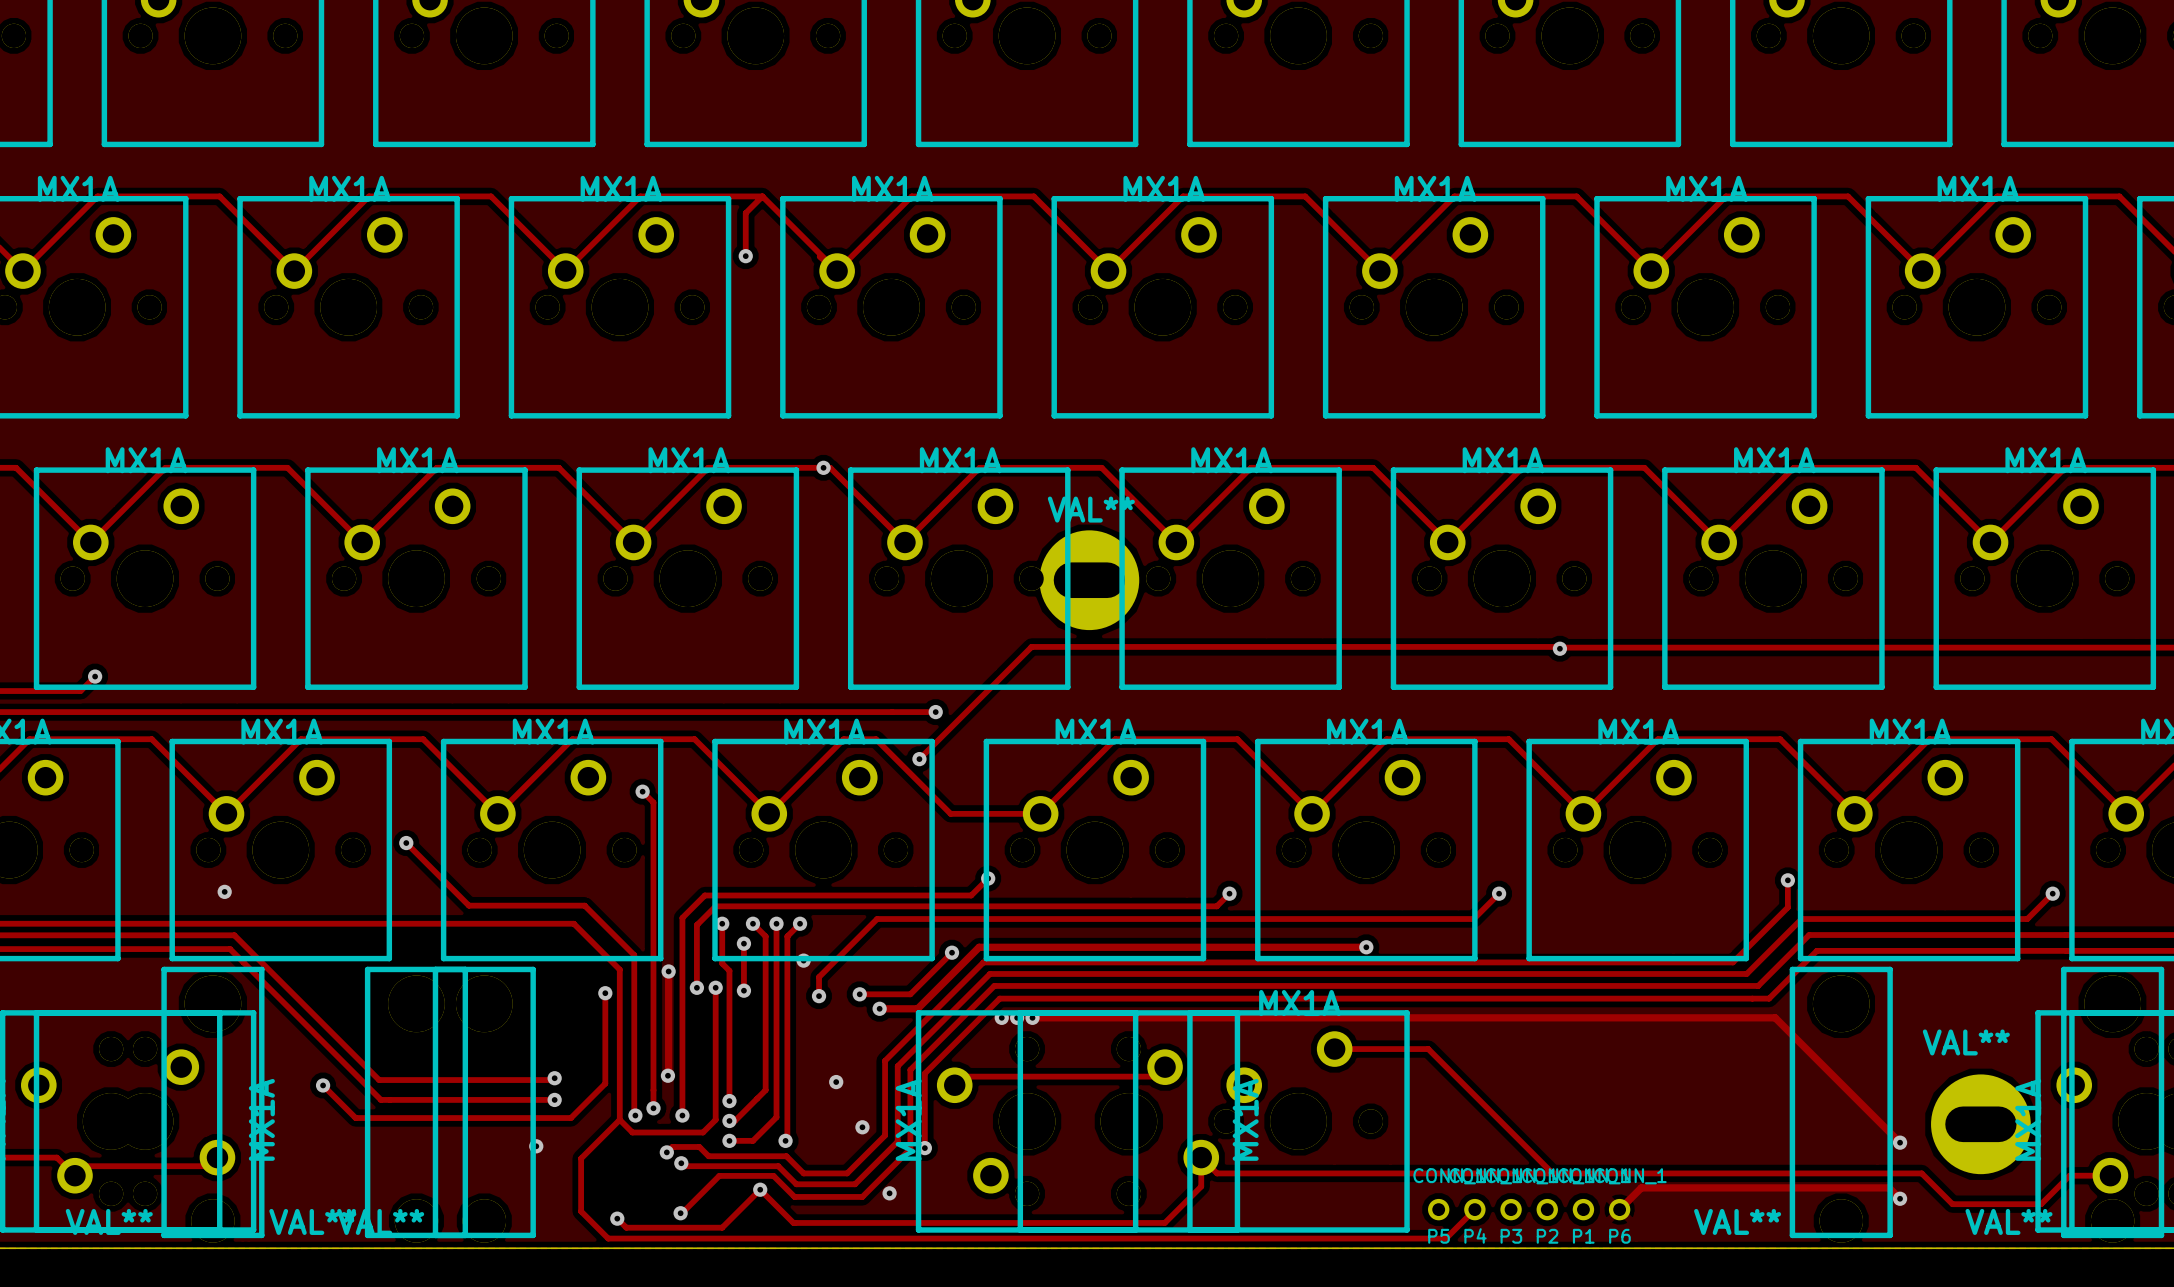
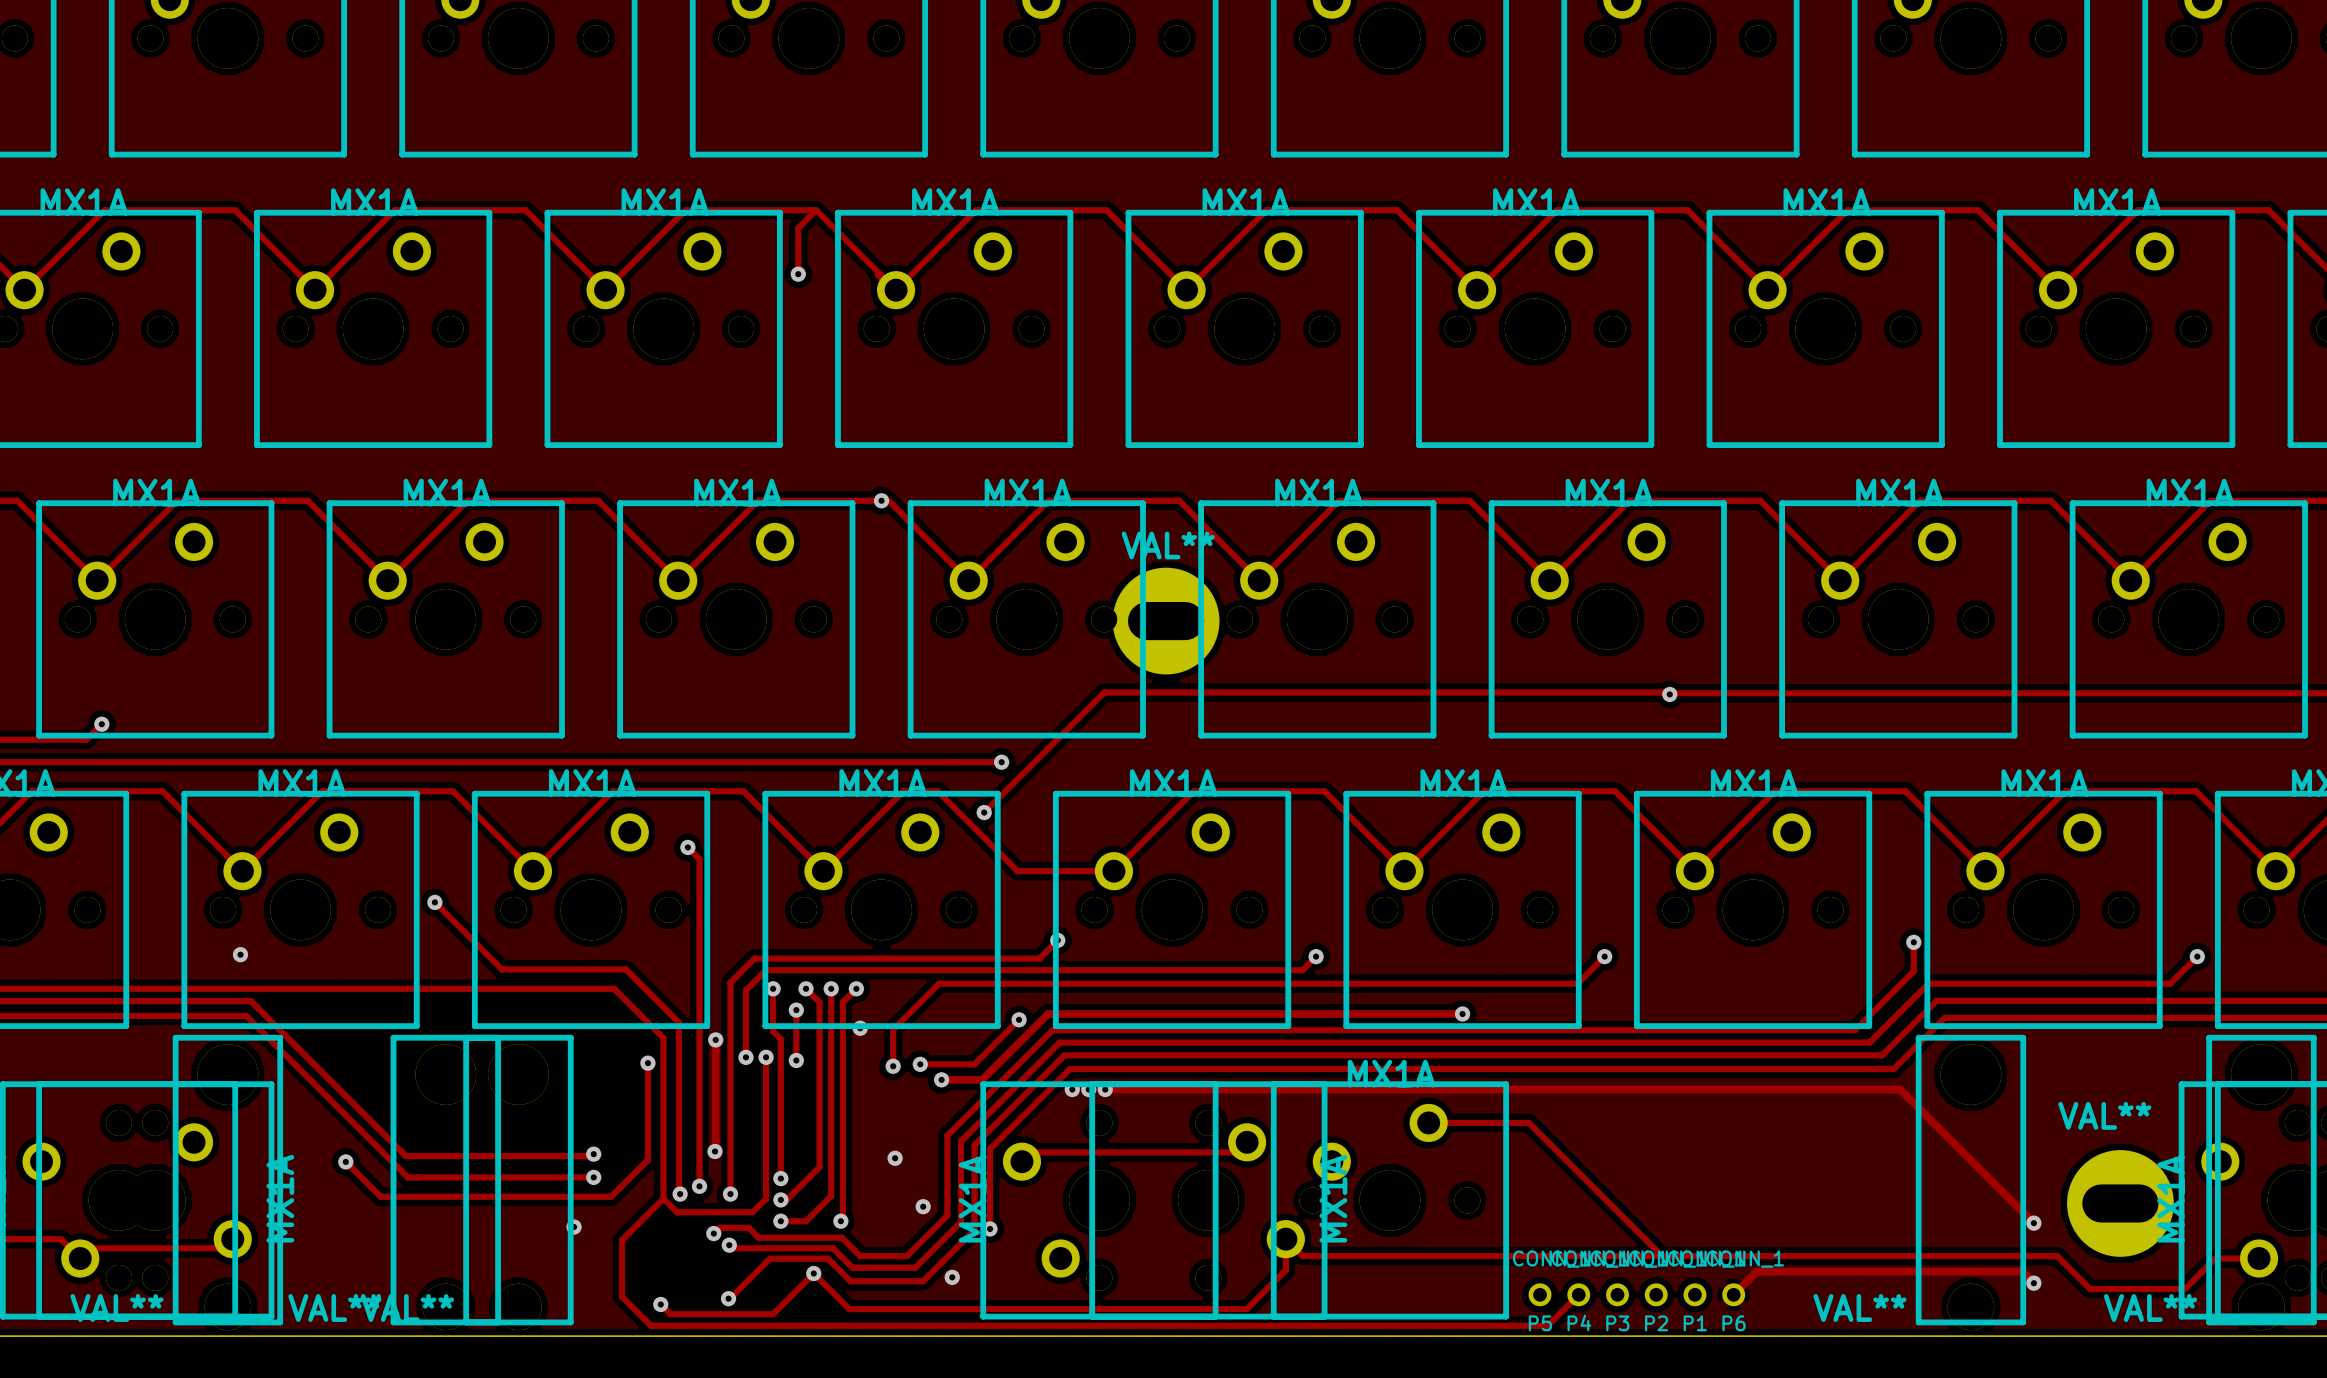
track: (834, 961) (819, 977) (819, 996) -> (893, 1029) (893, 1066)
via position: (819, 996) -> (893, 1066)

